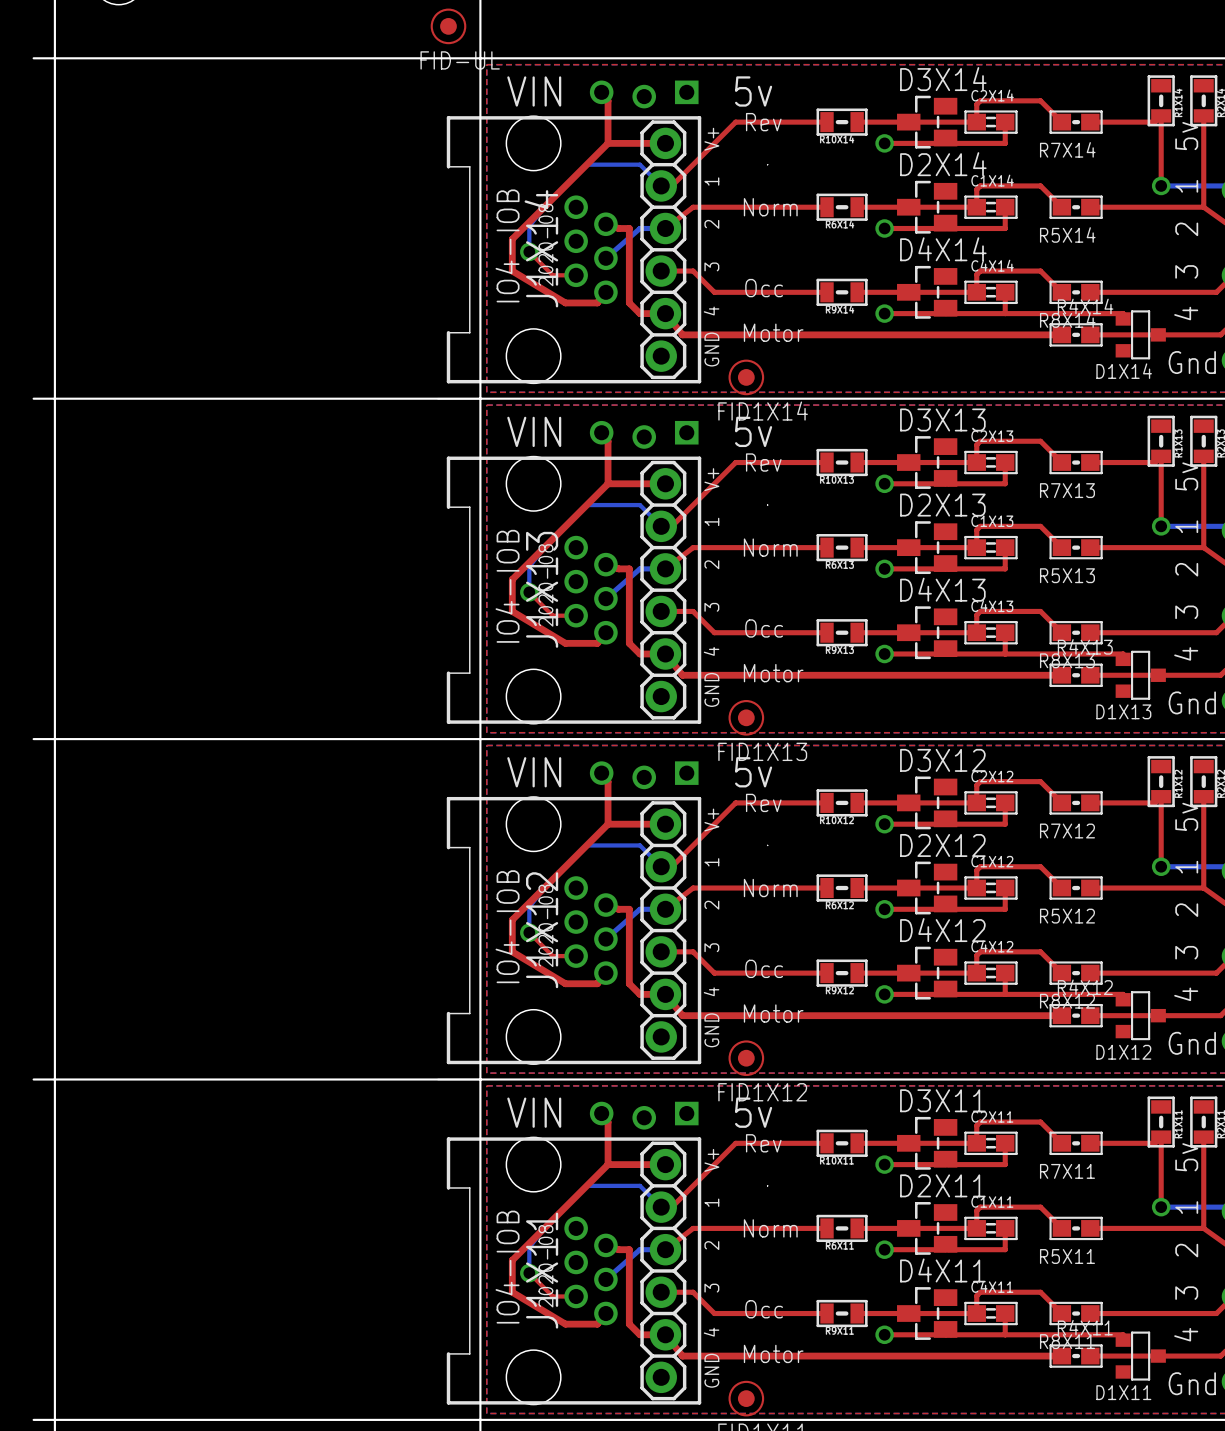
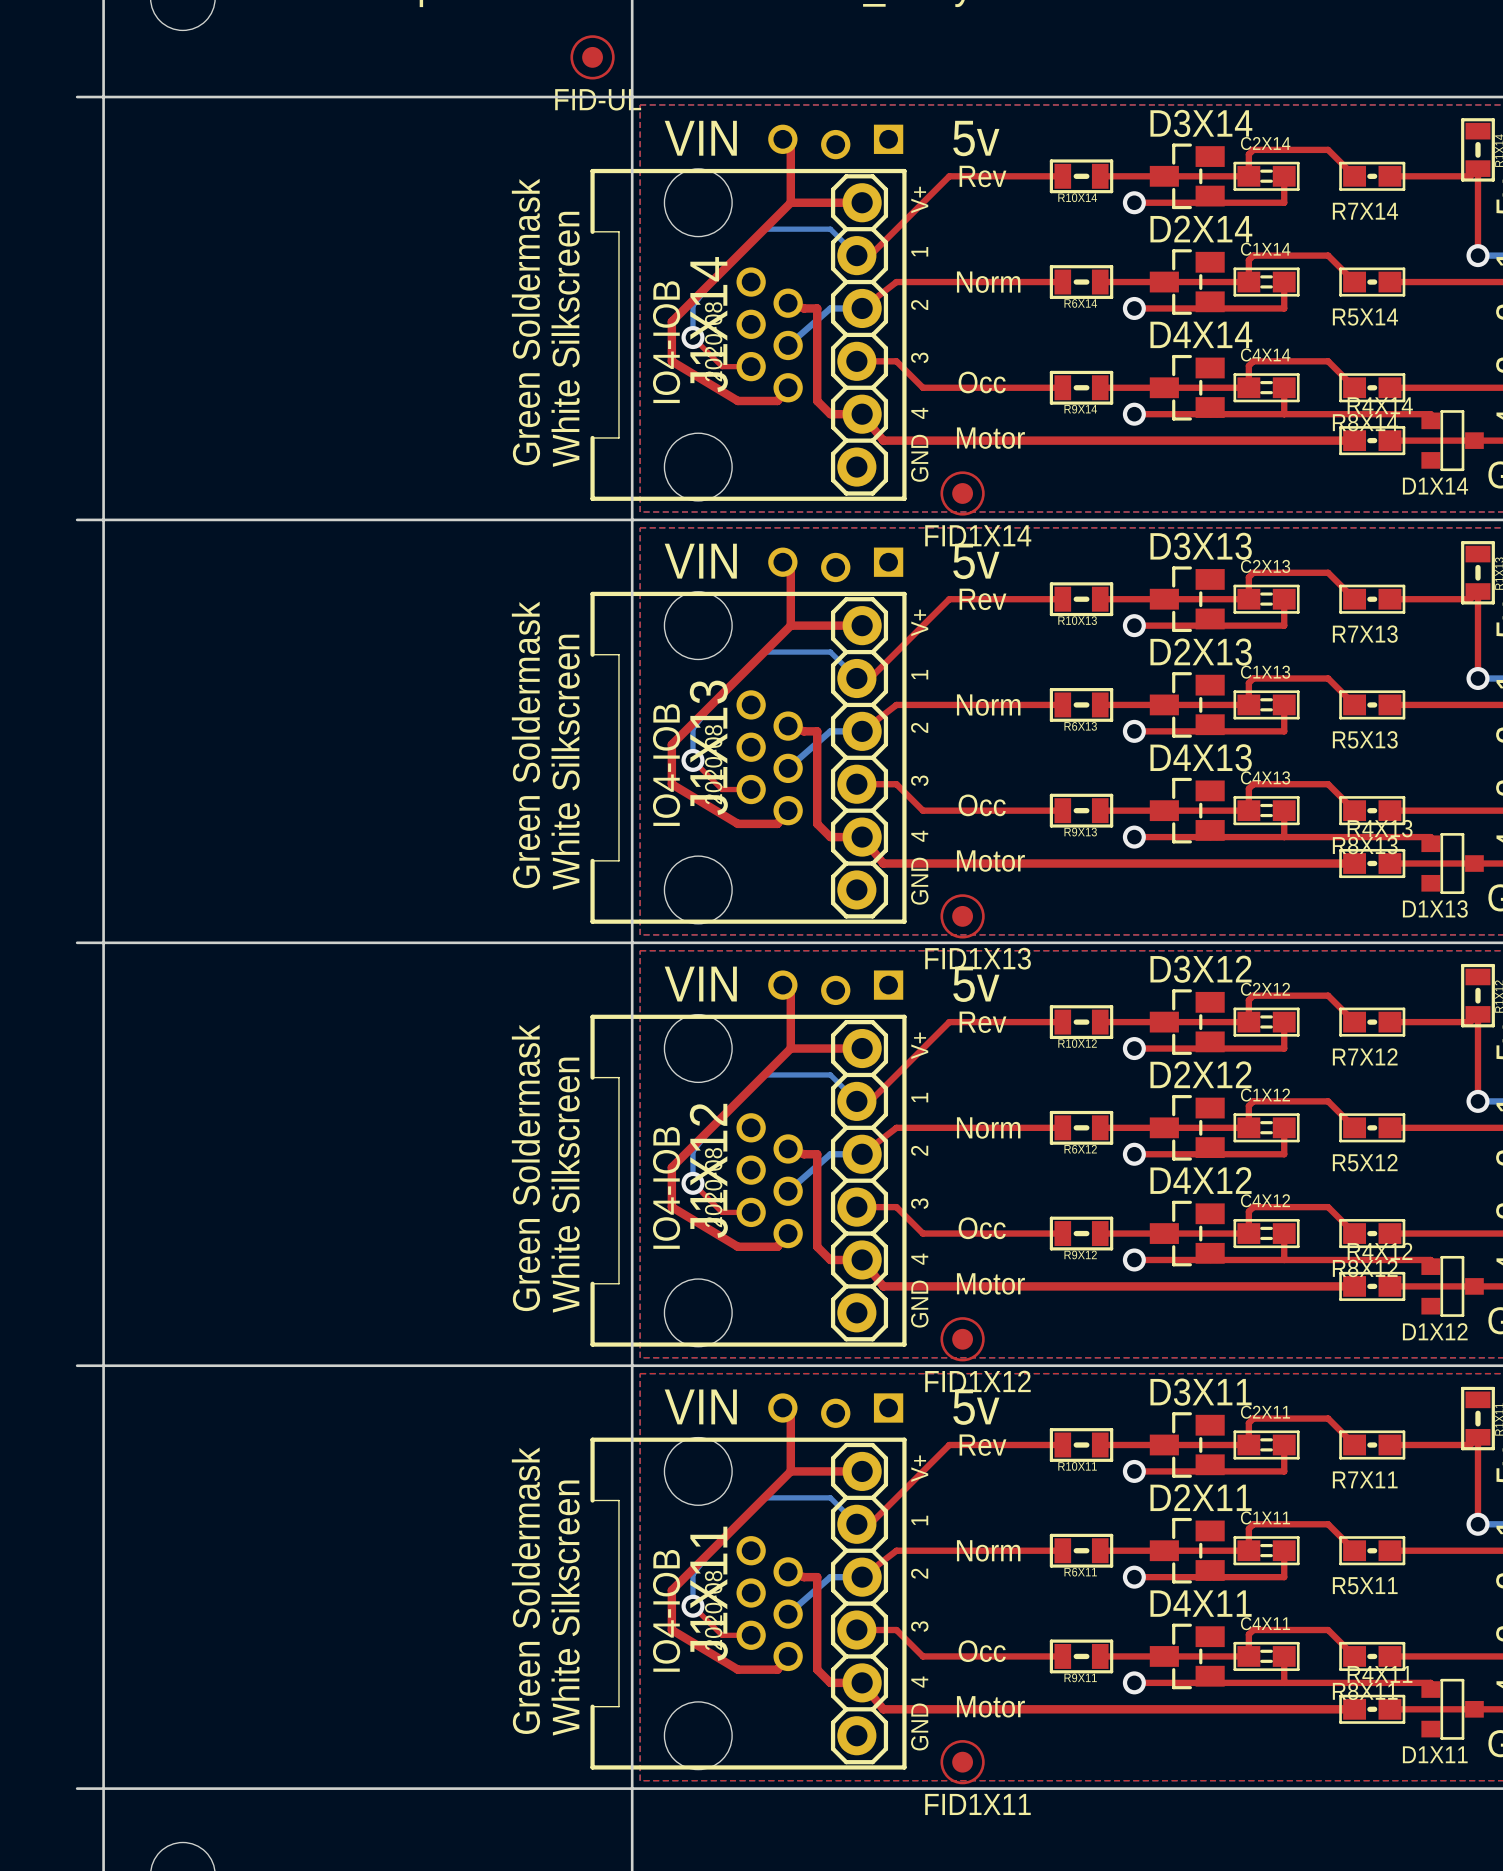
text: none -> Green Soldermask (525, 322)
text: none -> White Silkscreen (565, 339)
text: none -> Green Soldermask (525, 744)
text: none -> White Silkscreen (565, 762)
text: none -> Green Soldermask (525, 1167)
text: none -> White Silkscreen (565, 1185)
text: none -> Green Soldermask (525, 1590)
text: none -> White Silkscreen (565, 1608)

